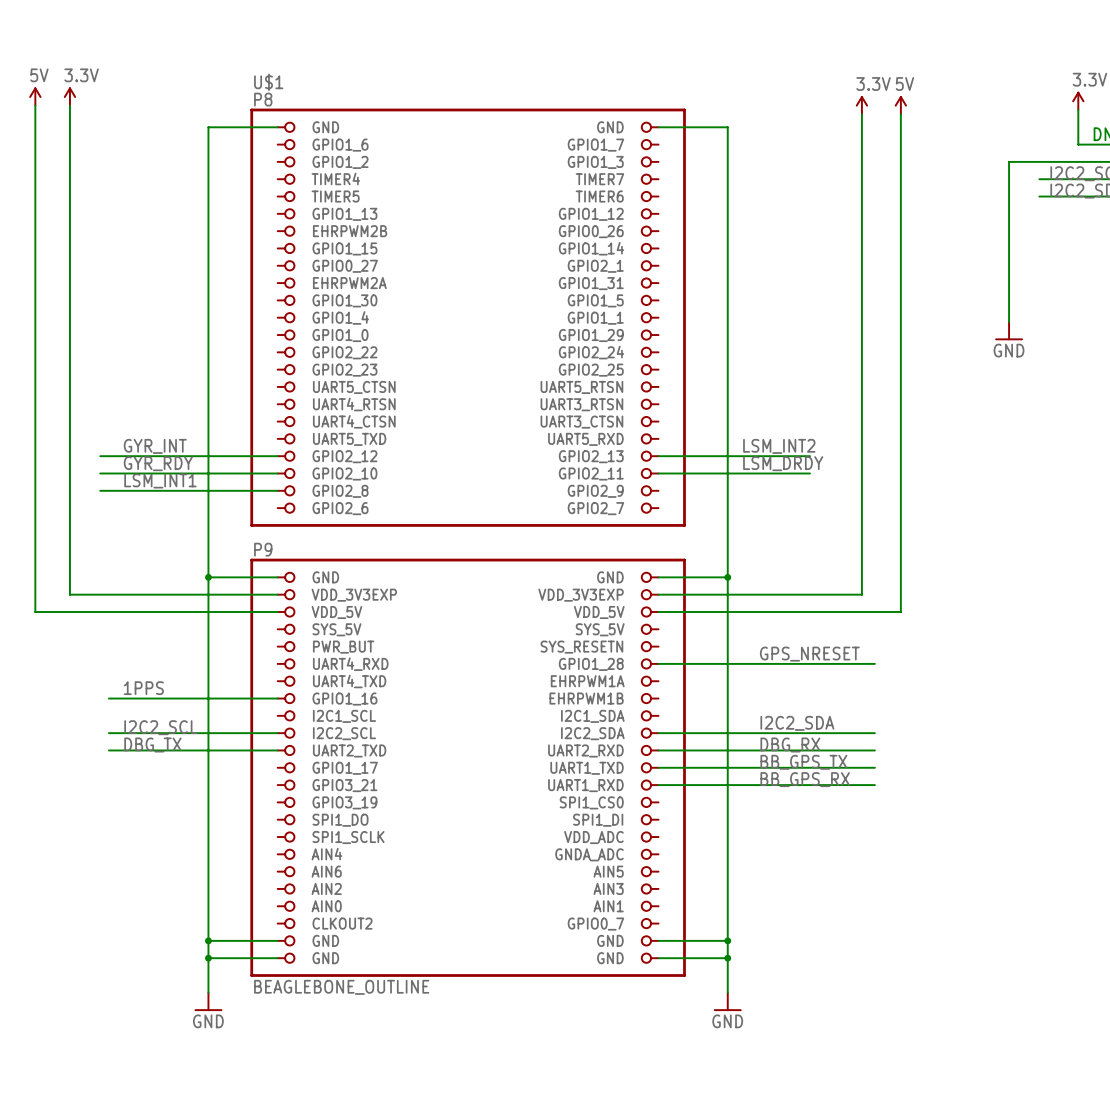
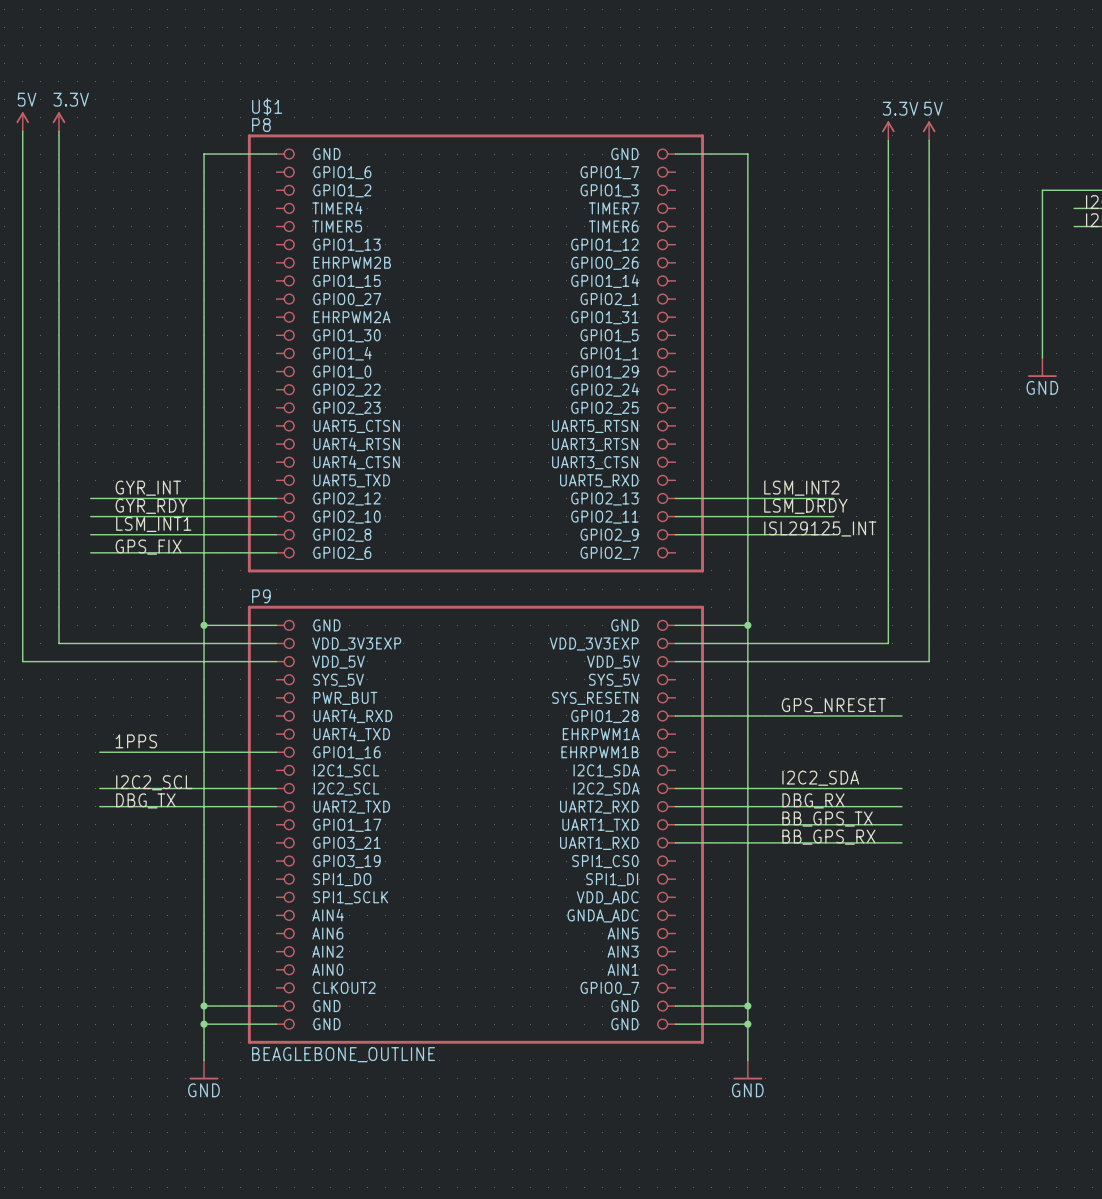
label: none -> ISL29125_INT (820, 528)
wire: none -> (675, 534) (833, 534)
label: none -> GPS_FIX (148, 547)
wire: none -> (90, 552) (276, 552)

